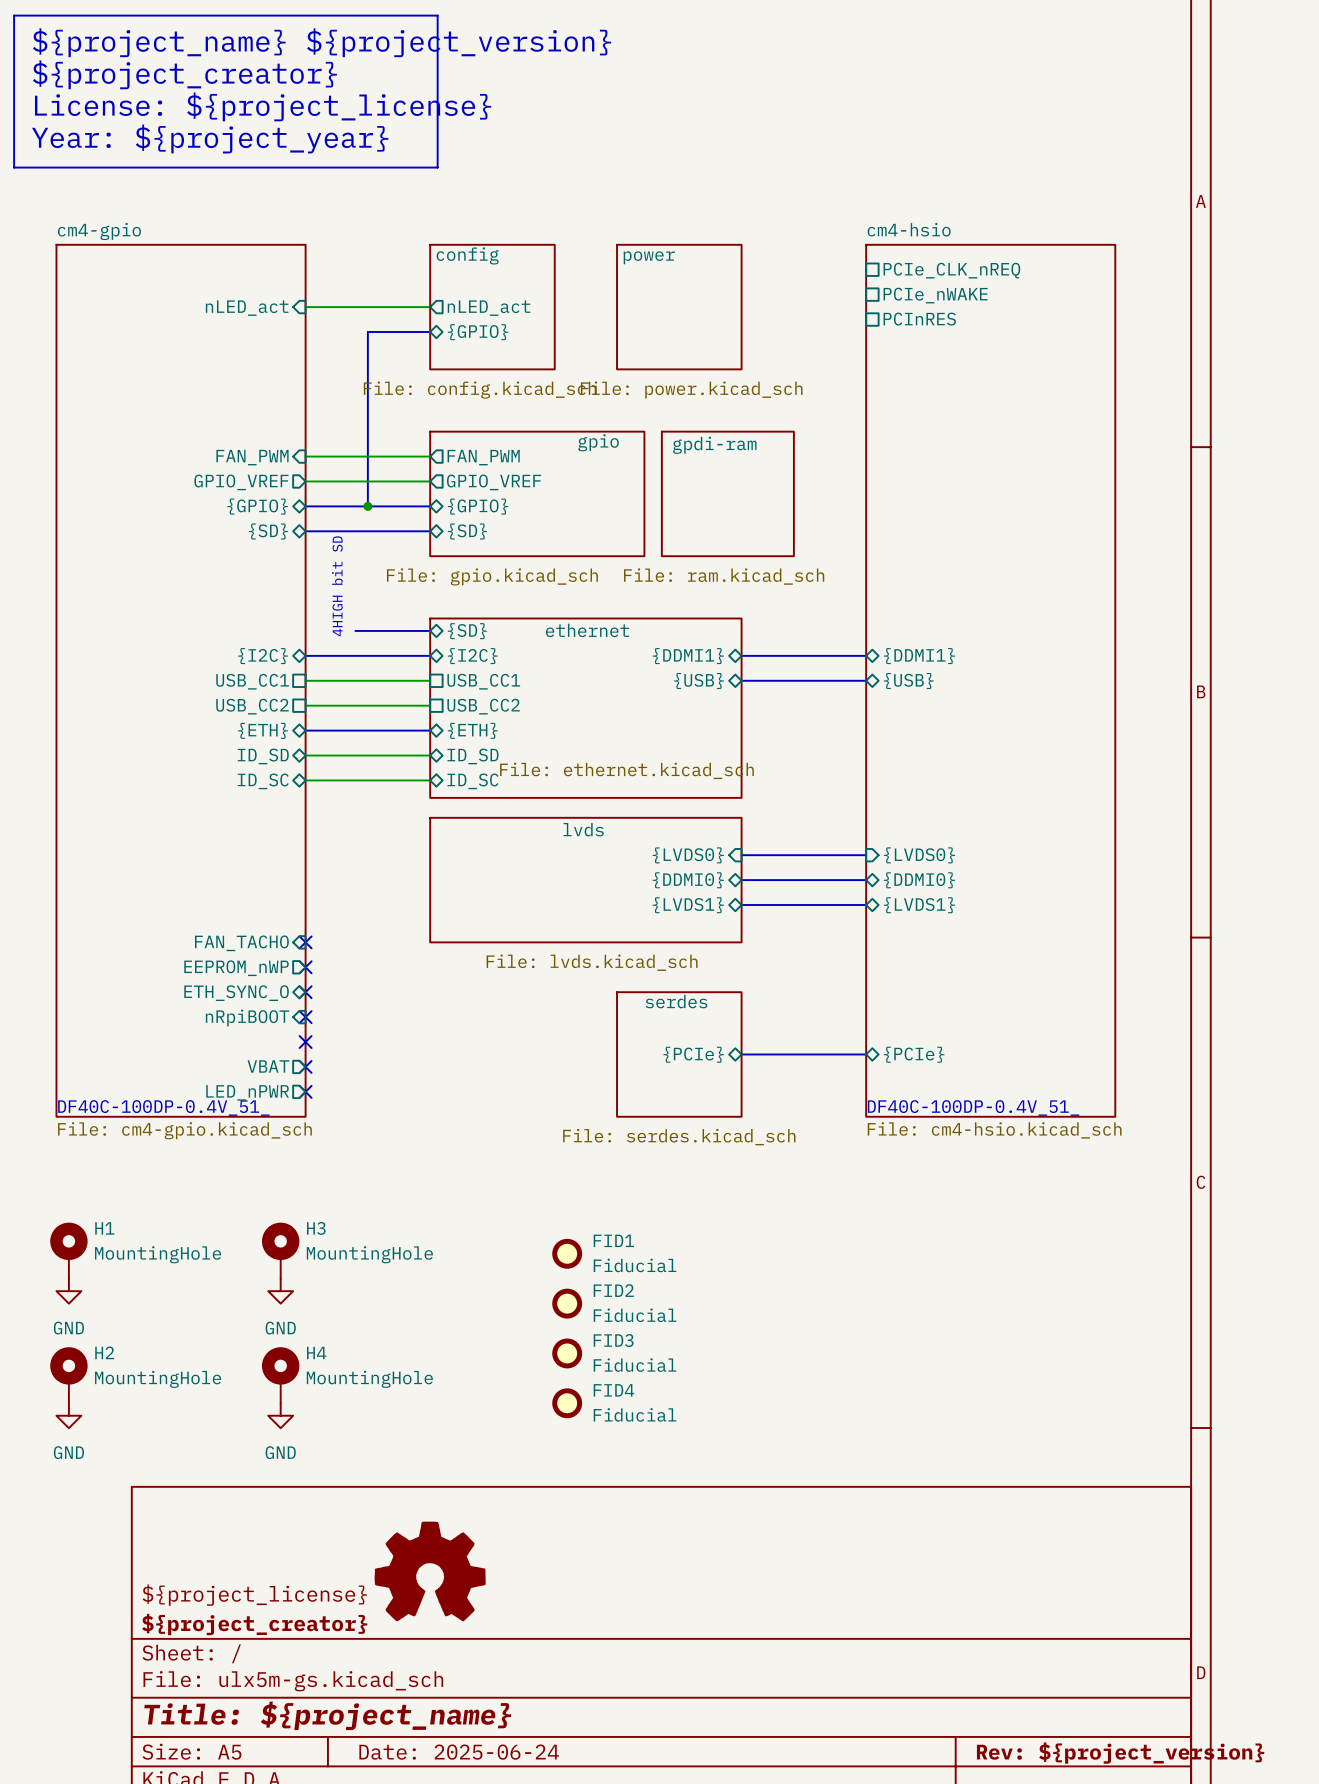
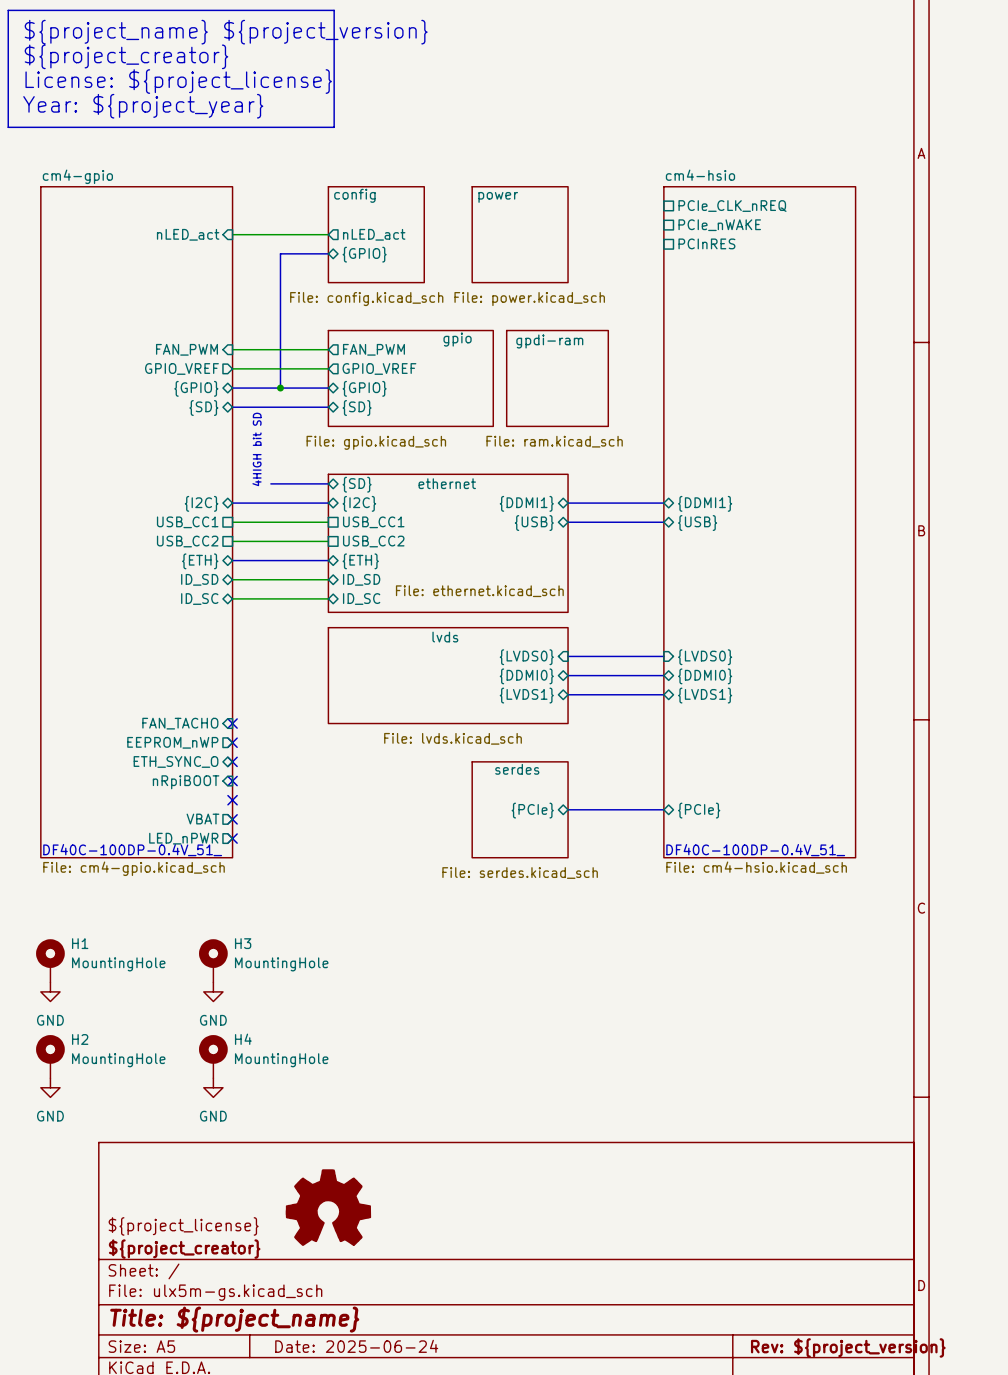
FID1: Fiducial (567, 1253) -> none
FID2: Fiducial (567, 1303) -> none
FID3: Fiducial (567, 1353) -> none
FID4: Fiducial (567, 1403) -> none

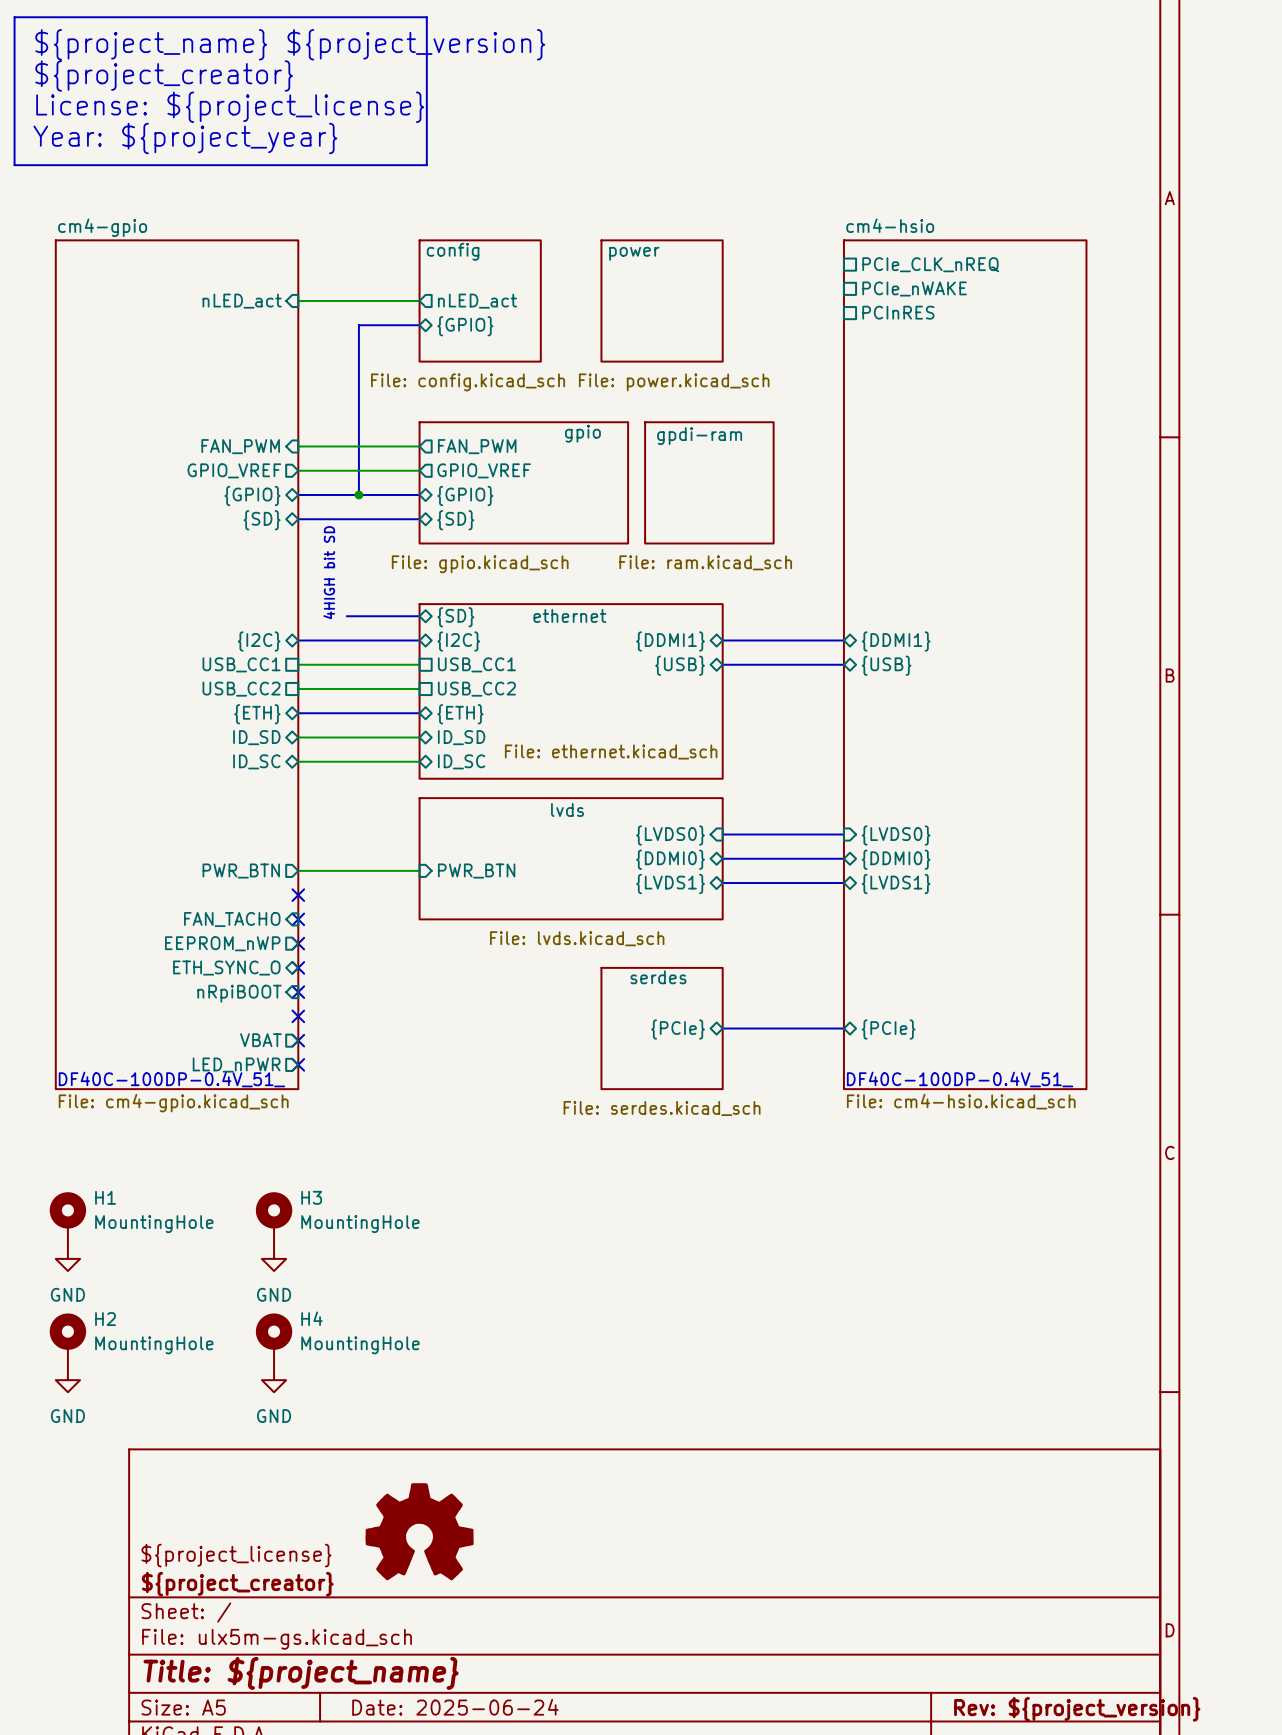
sheet pin: none -> PWR_BTN (241, 871)
wire: none -> (298, 870) (419, 870)
sheet pin: none -> PWR_BTN (476, 871)
no-connect mark: none -> (298, 895)

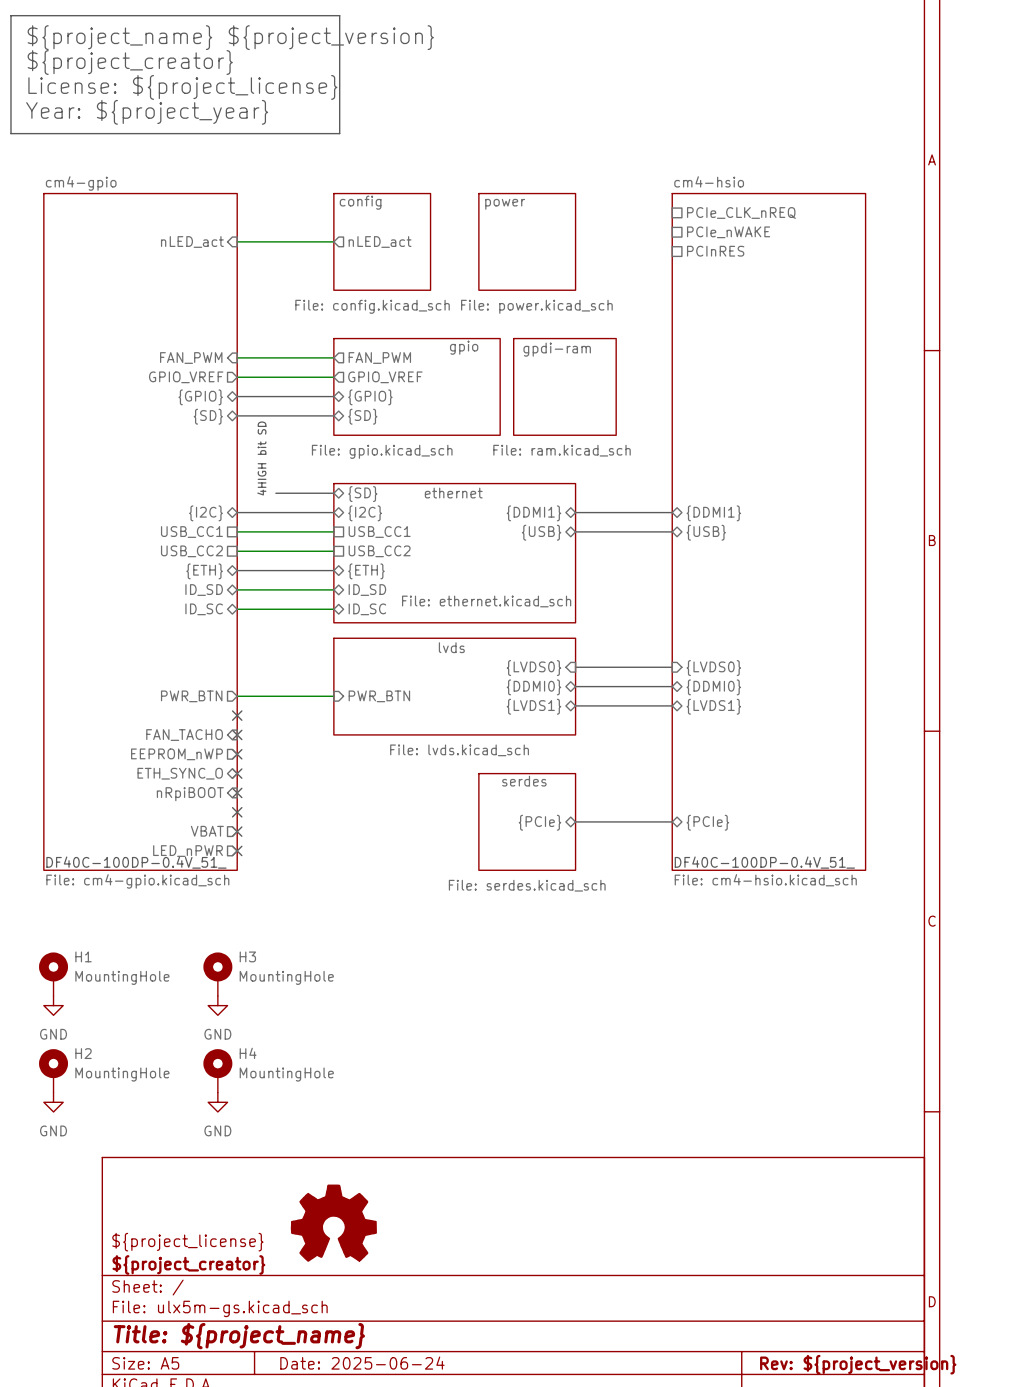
bus: (419, 325) (358, 325) (358, 494) -> none
sheet pin: {GPIO} (465, 326) -> none
junction: (358, 494) -> none

